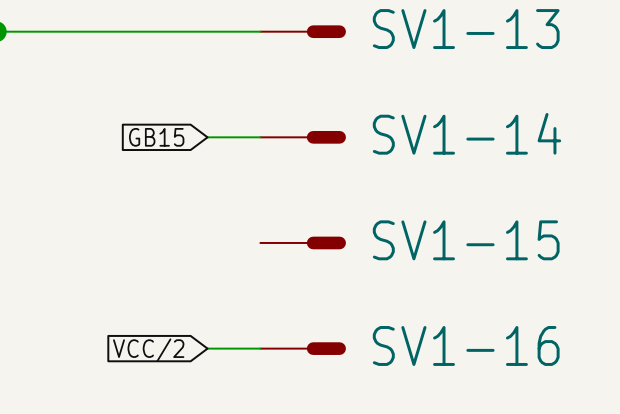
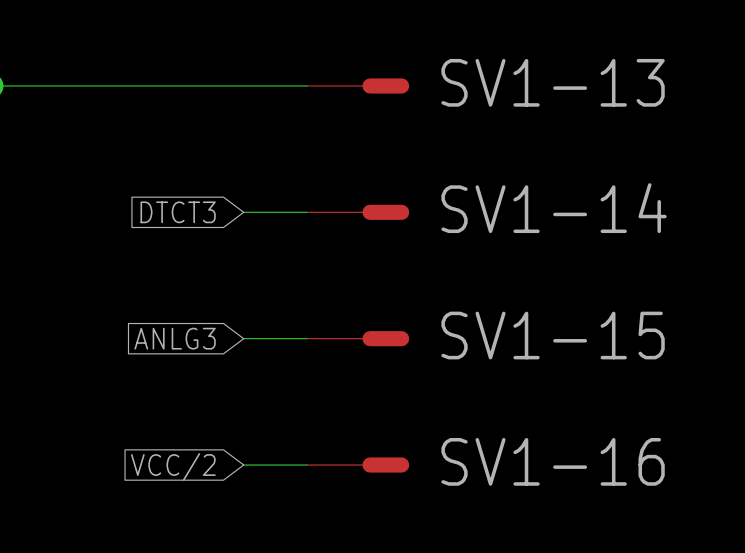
global label: GB15 (156, 137) -> DTCT3 (178, 212)
global label: none -> ANLG3 (175, 338)
wire: none -> (243, 338) (306, 338)

